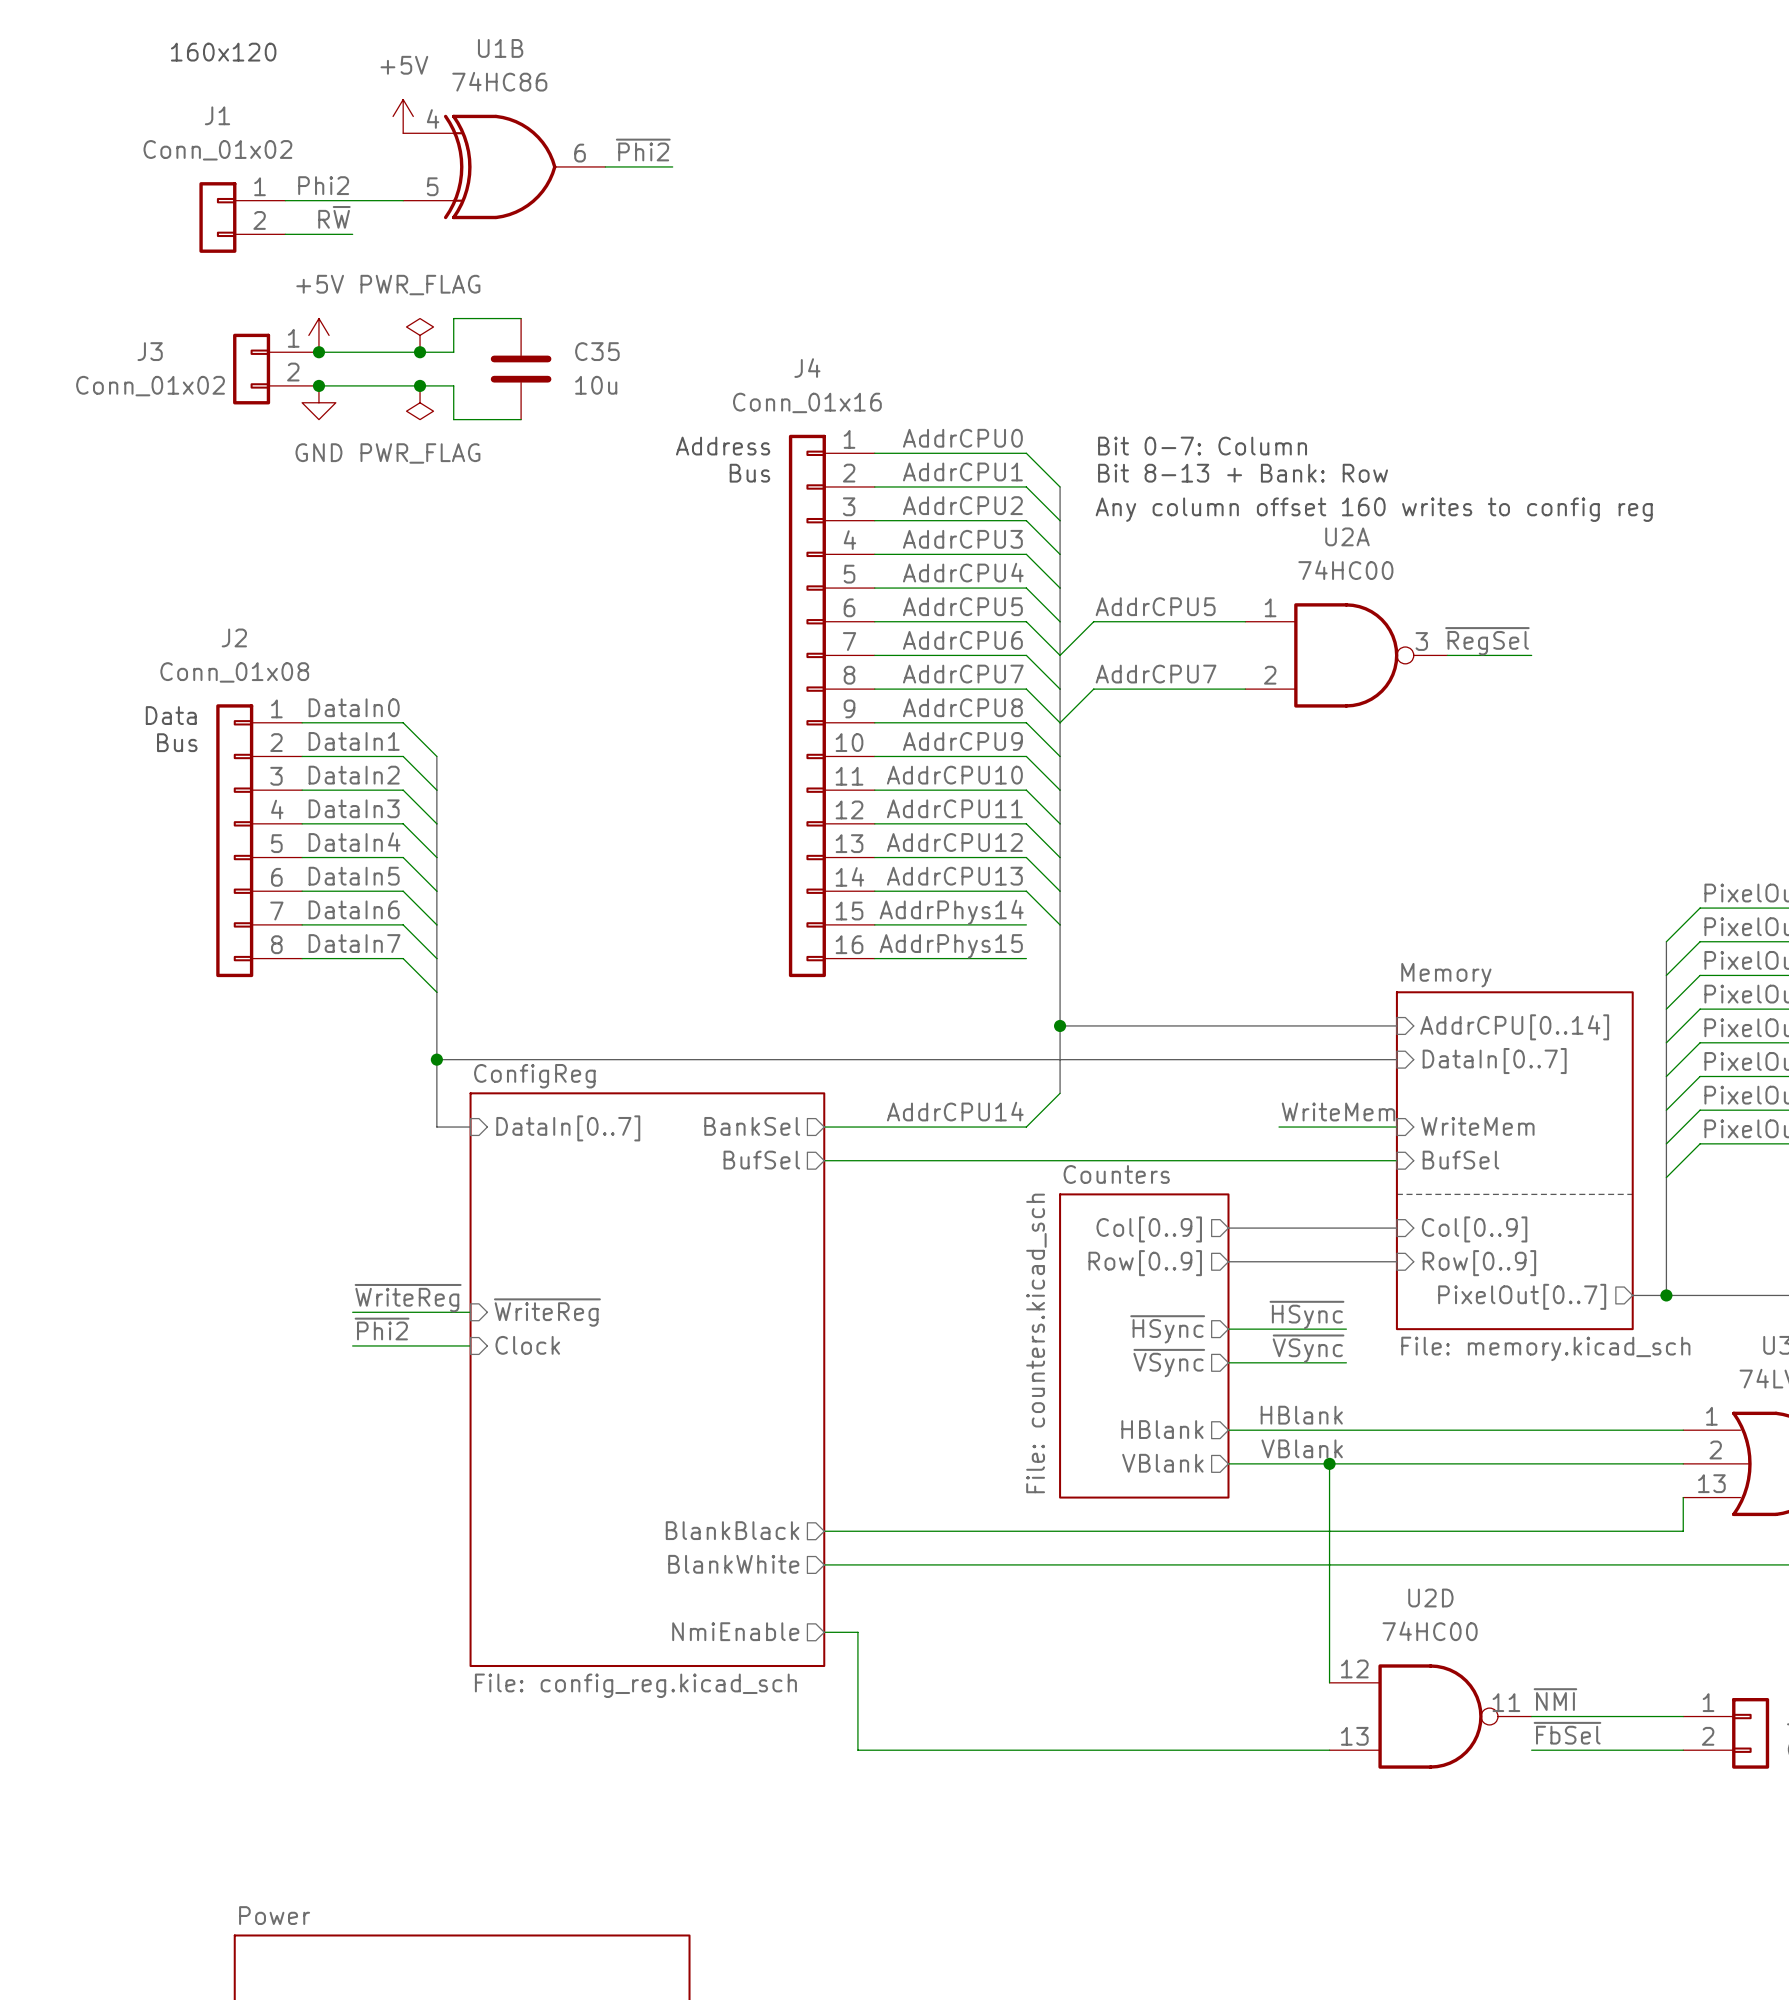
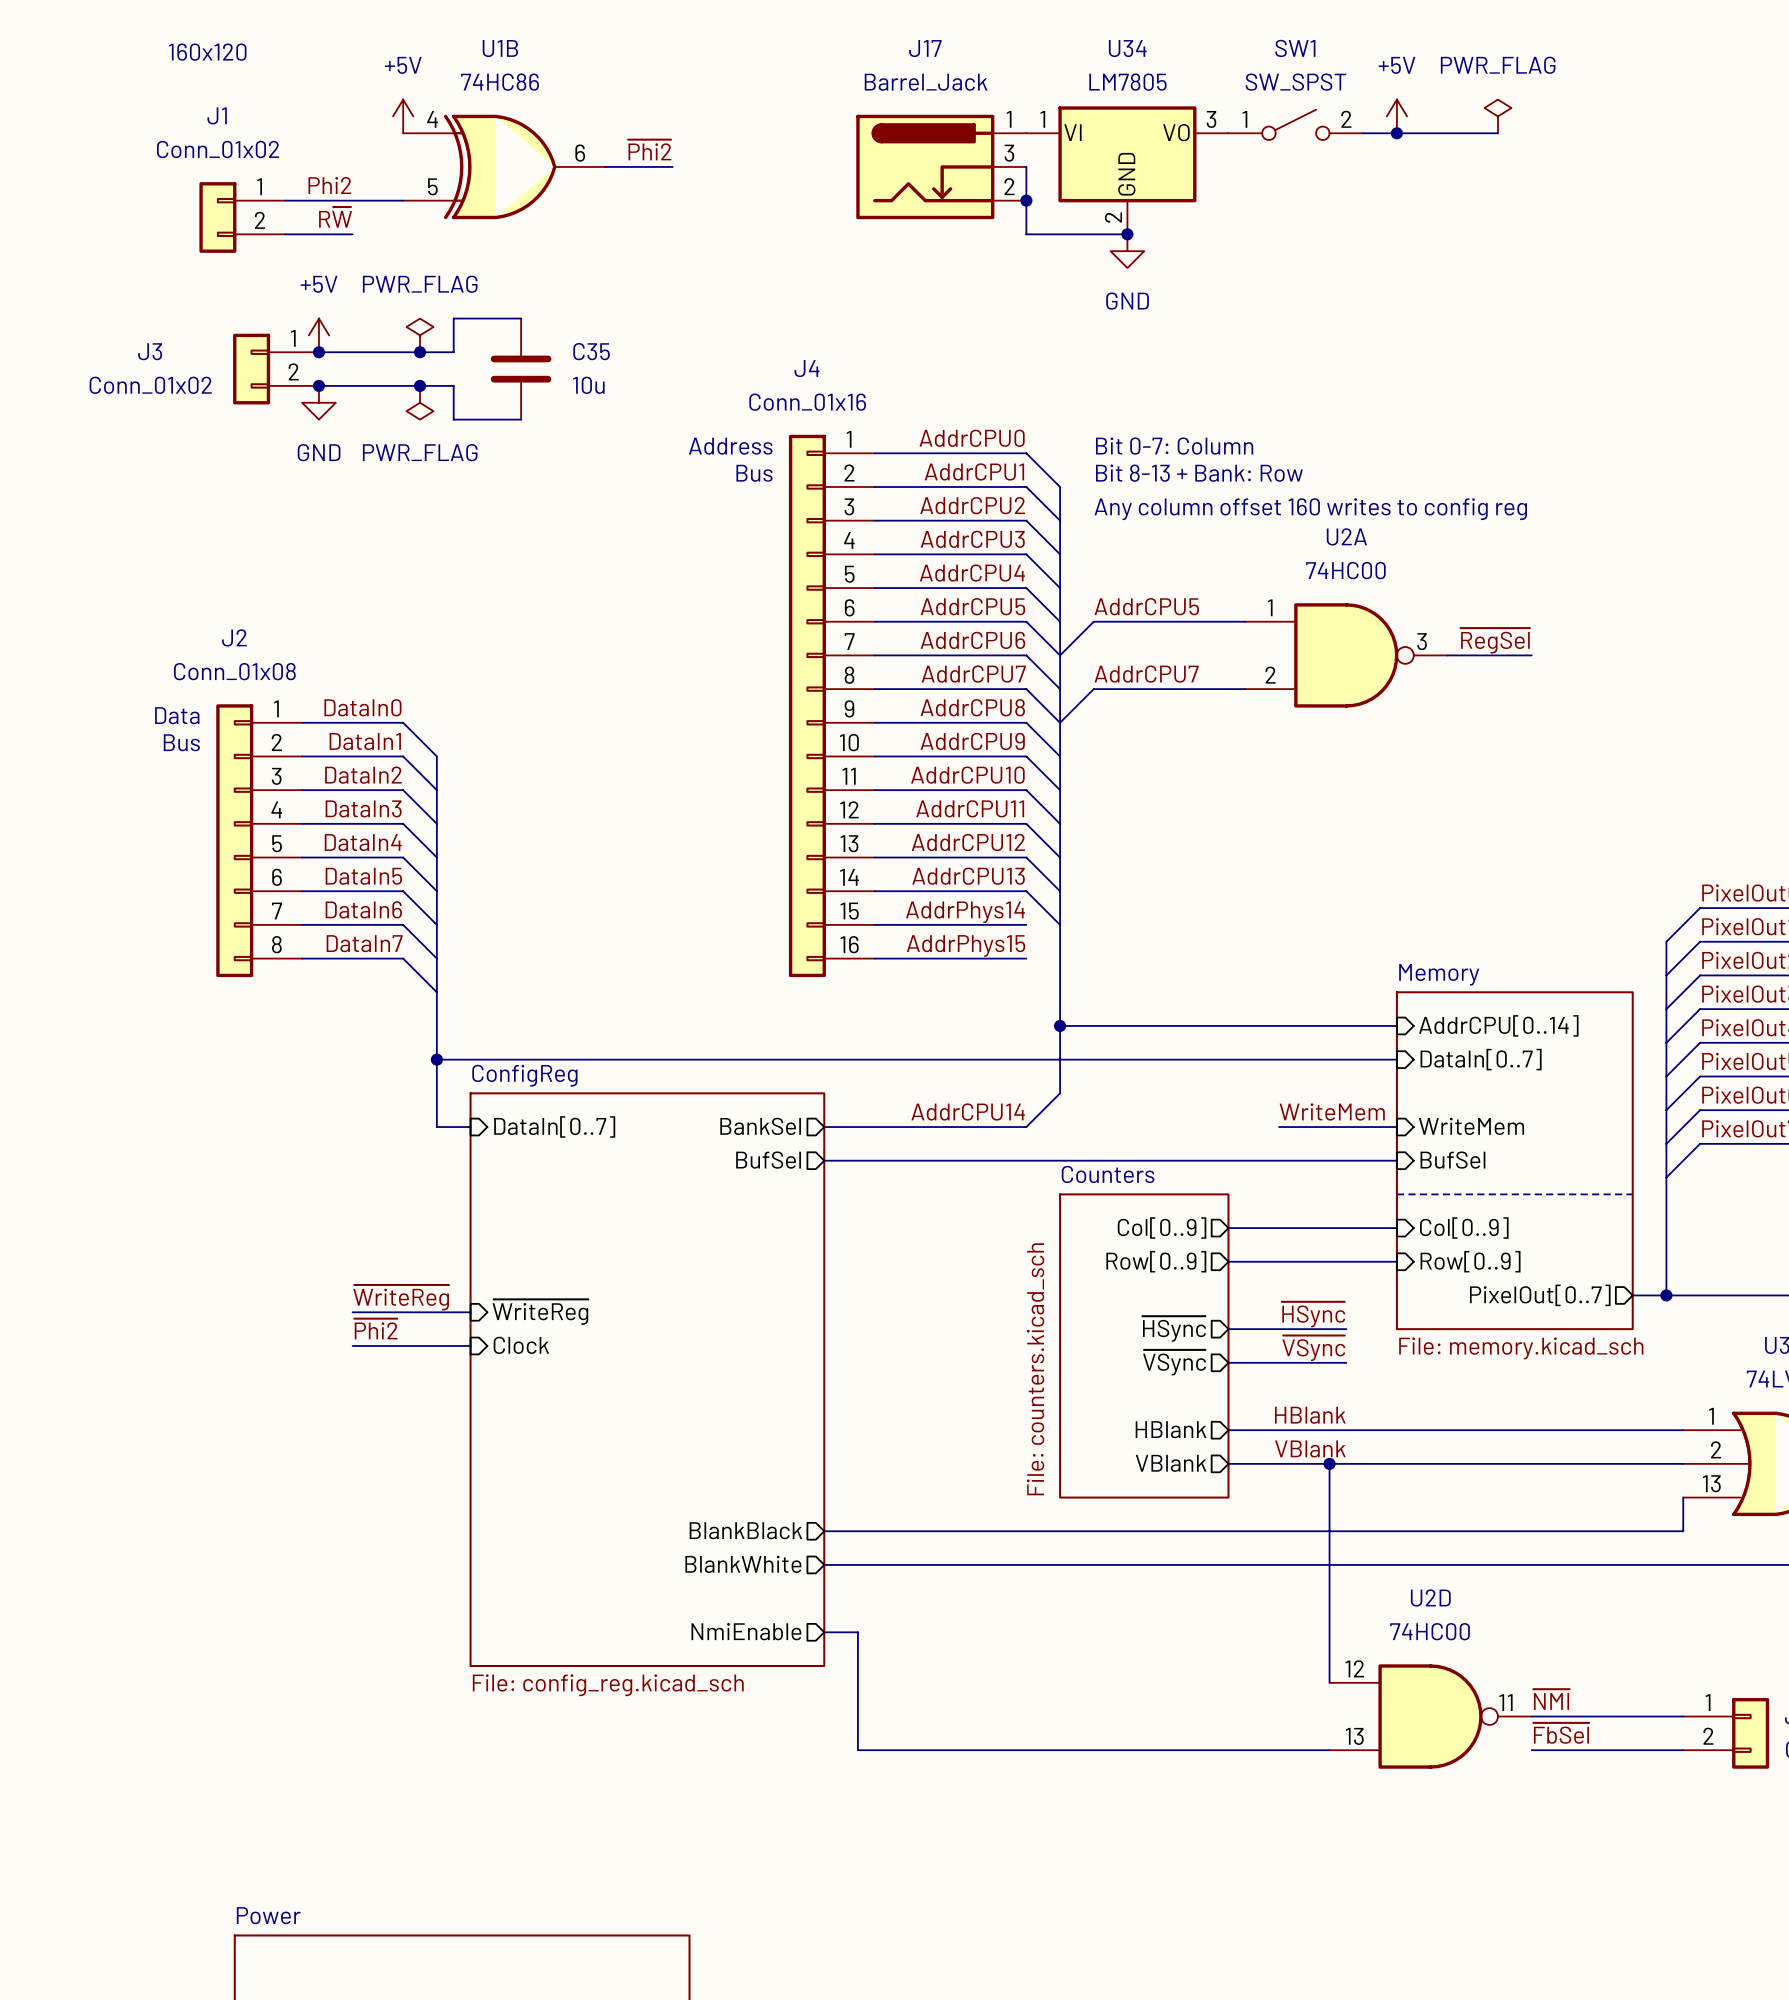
power symbol: none -> +5V (1396, 116)
power symbol: none -> PWR_FLAG (1497, 116)
SW1: none -> SW_SPST (1295, 124)
wire: none -> (1363, 133) (1497, 133)
junction: none -> (1396, 133)
J17: none -> Barrel_Jack (941, 166)
wire: none -> (1026, 166) (1026, 234) (1127, 234)
U34: none -> LM7805 (1127, 170)
junction: none -> (1026, 200)
junction: none -> (1127, 234)
power symbol: none -> GND (1127, 251)

